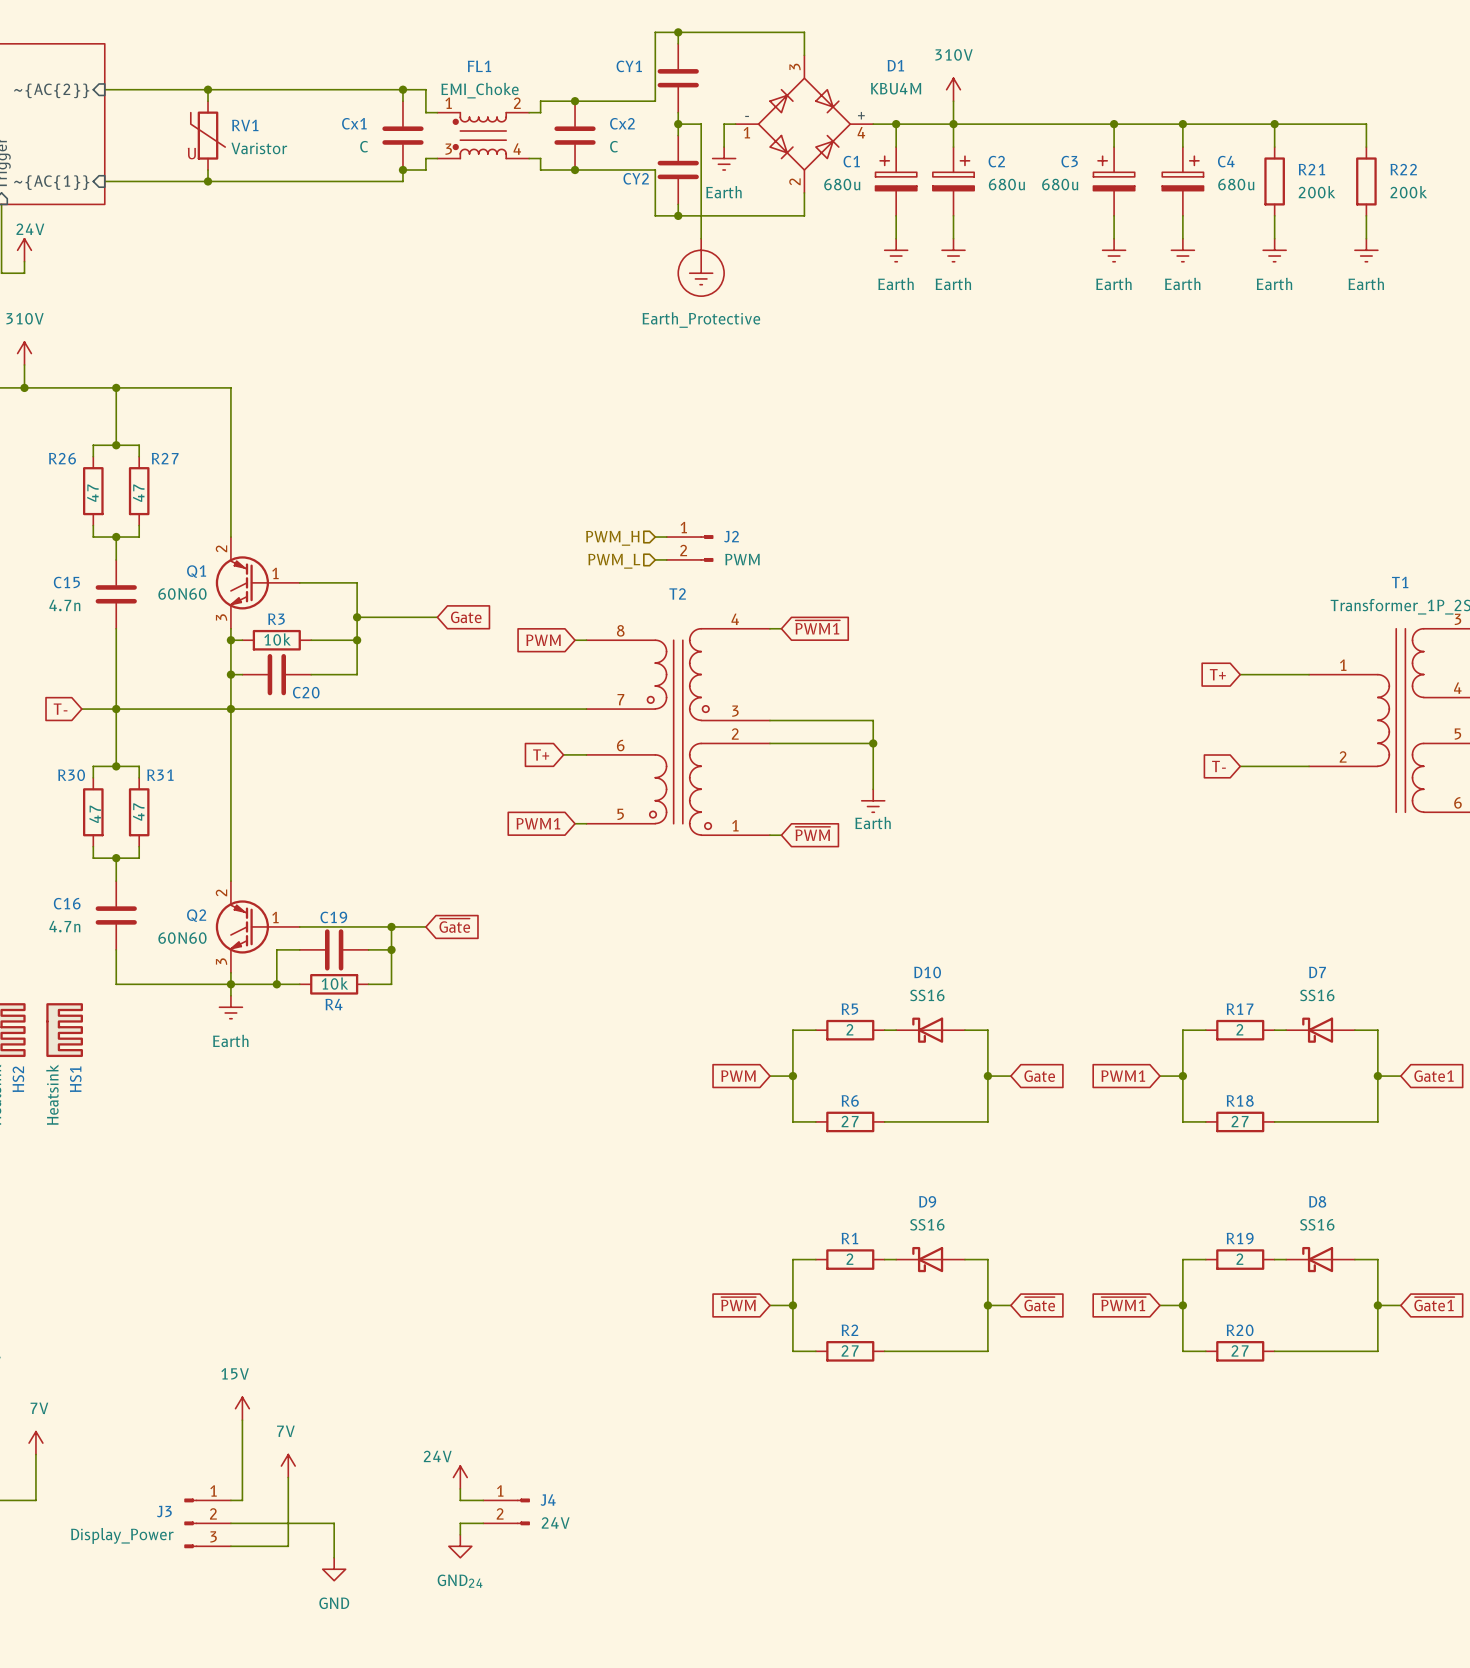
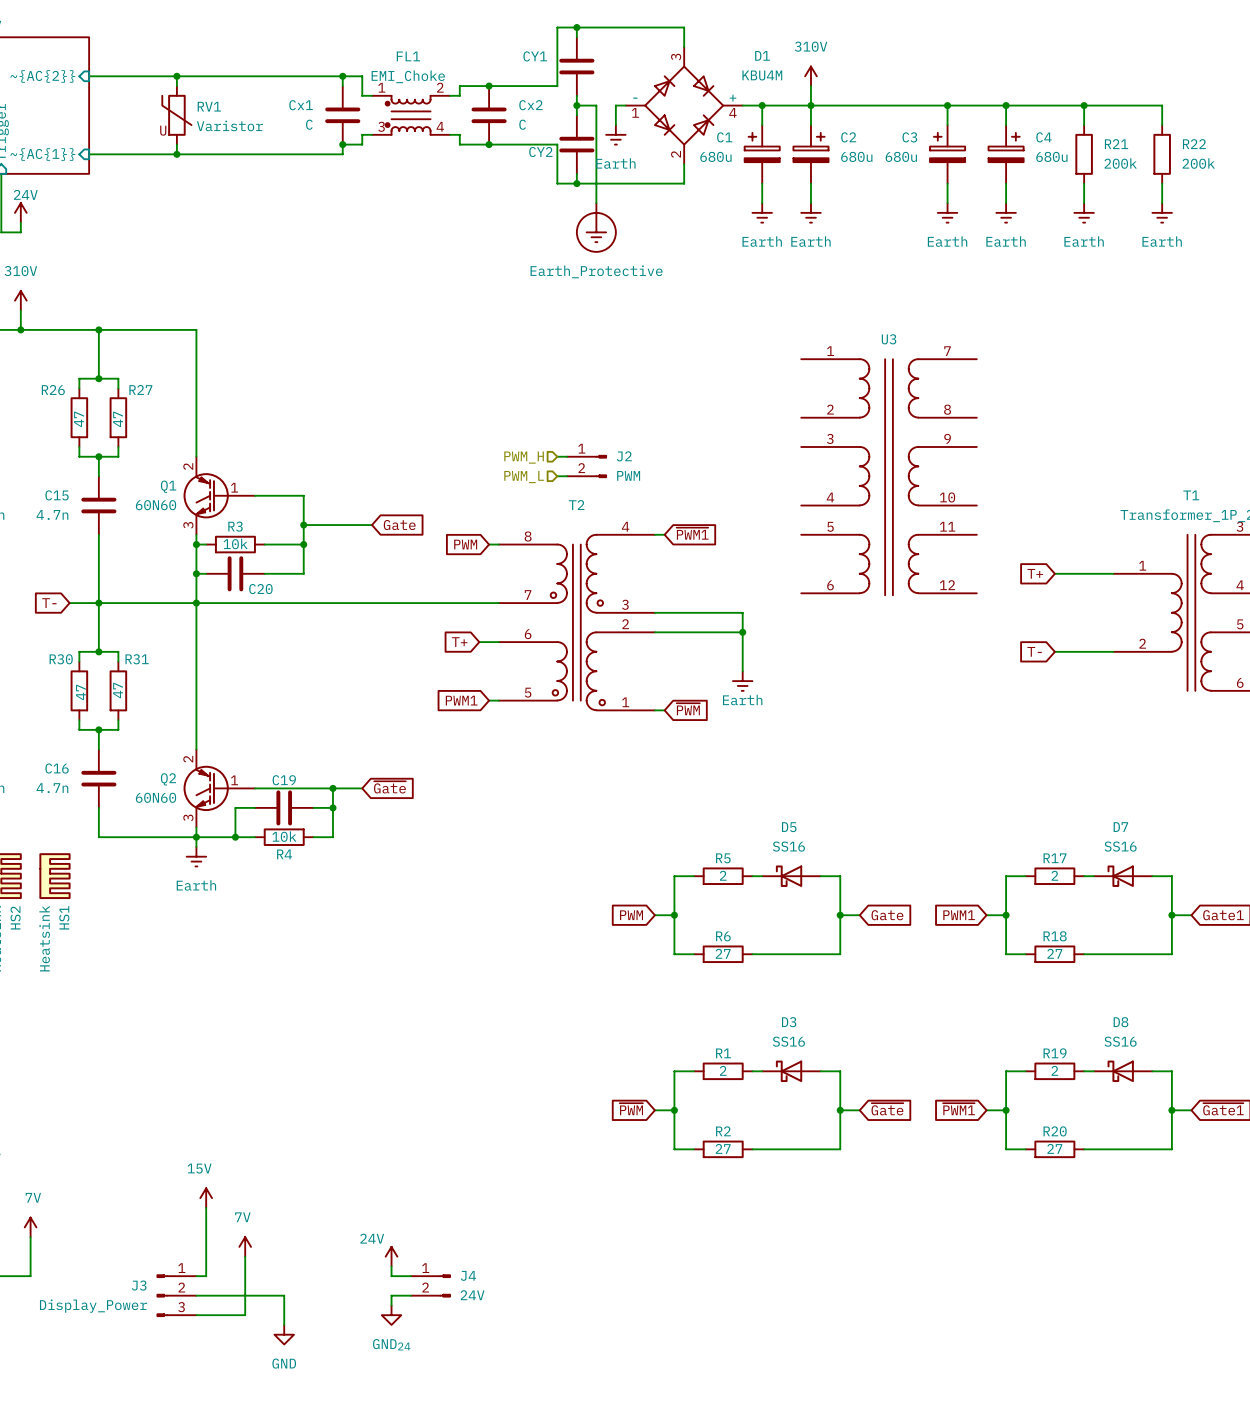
U3: none -> (889, 477)
D10 name: D10 (927, 972) -> D5 (789, 827)
D9 name: D9 (927, 1201) -> D3 (789, 1022)

